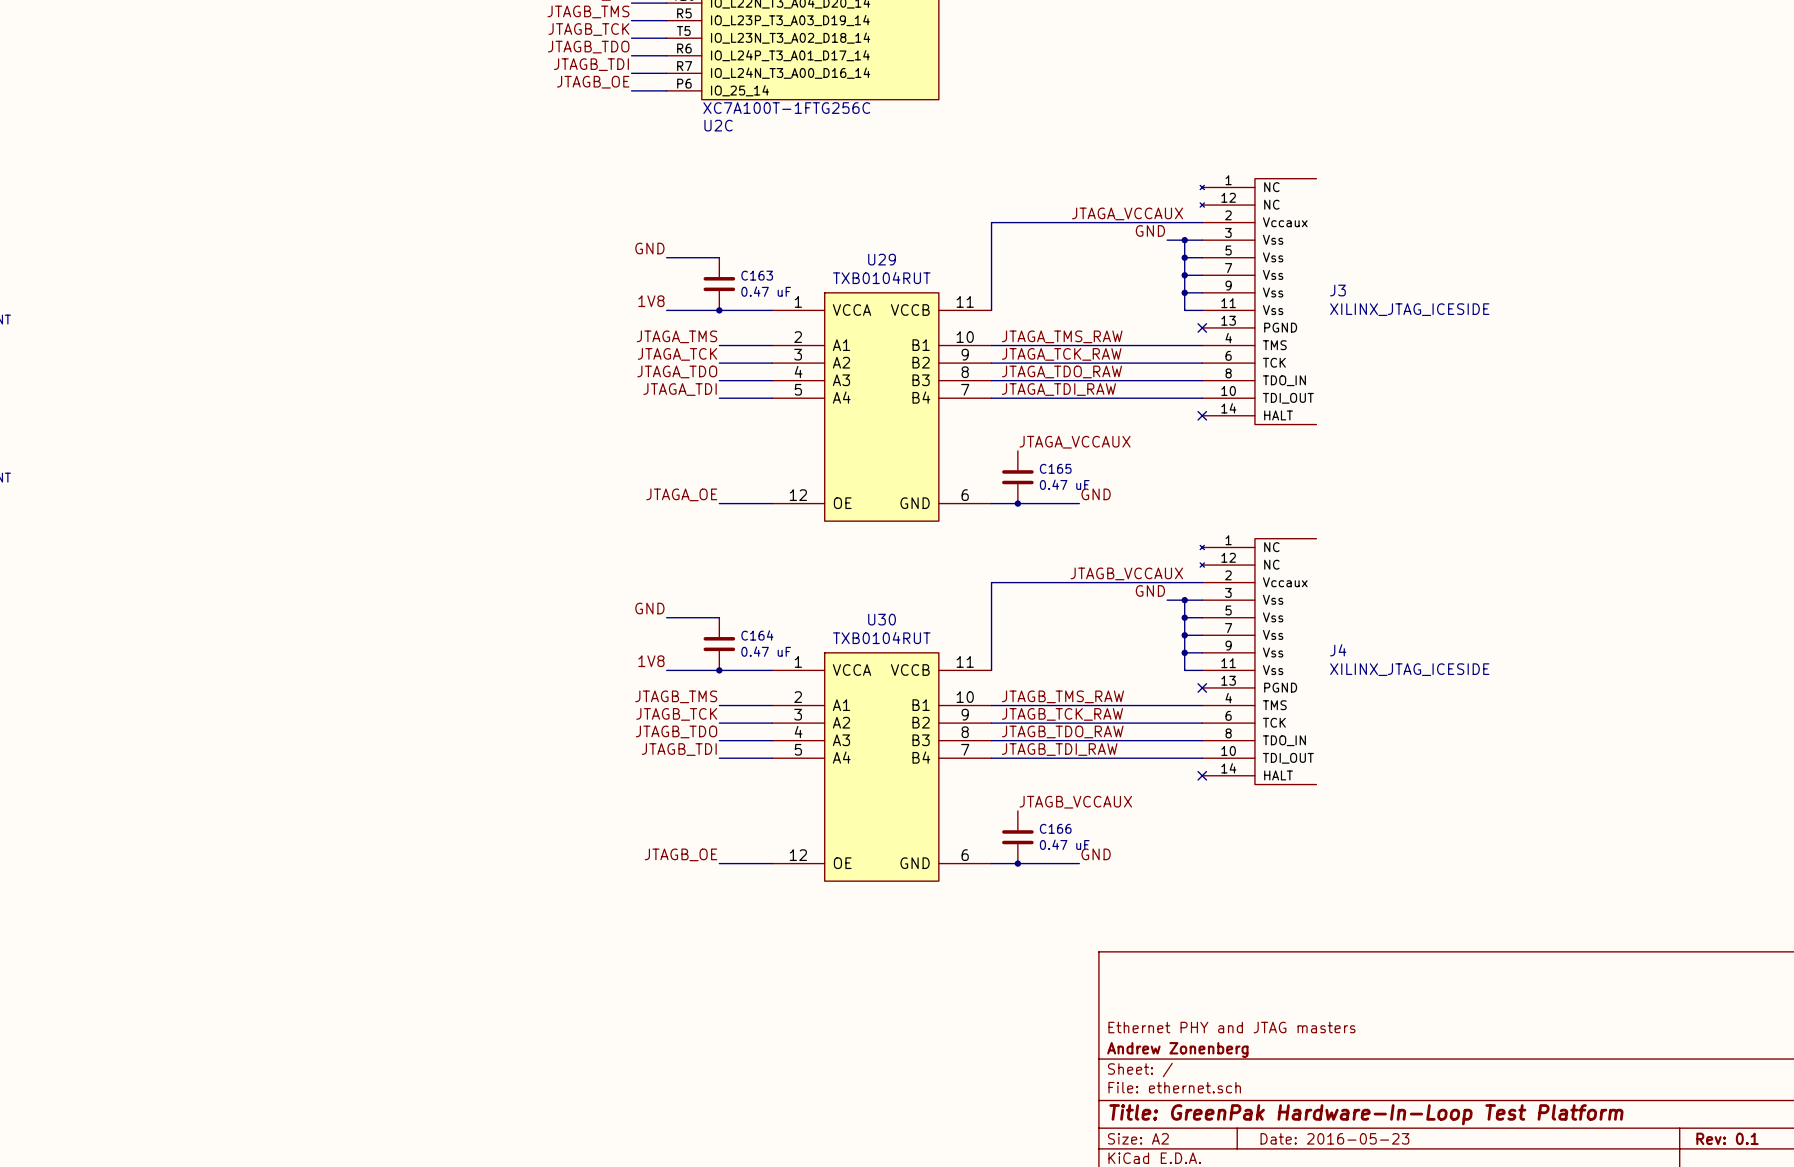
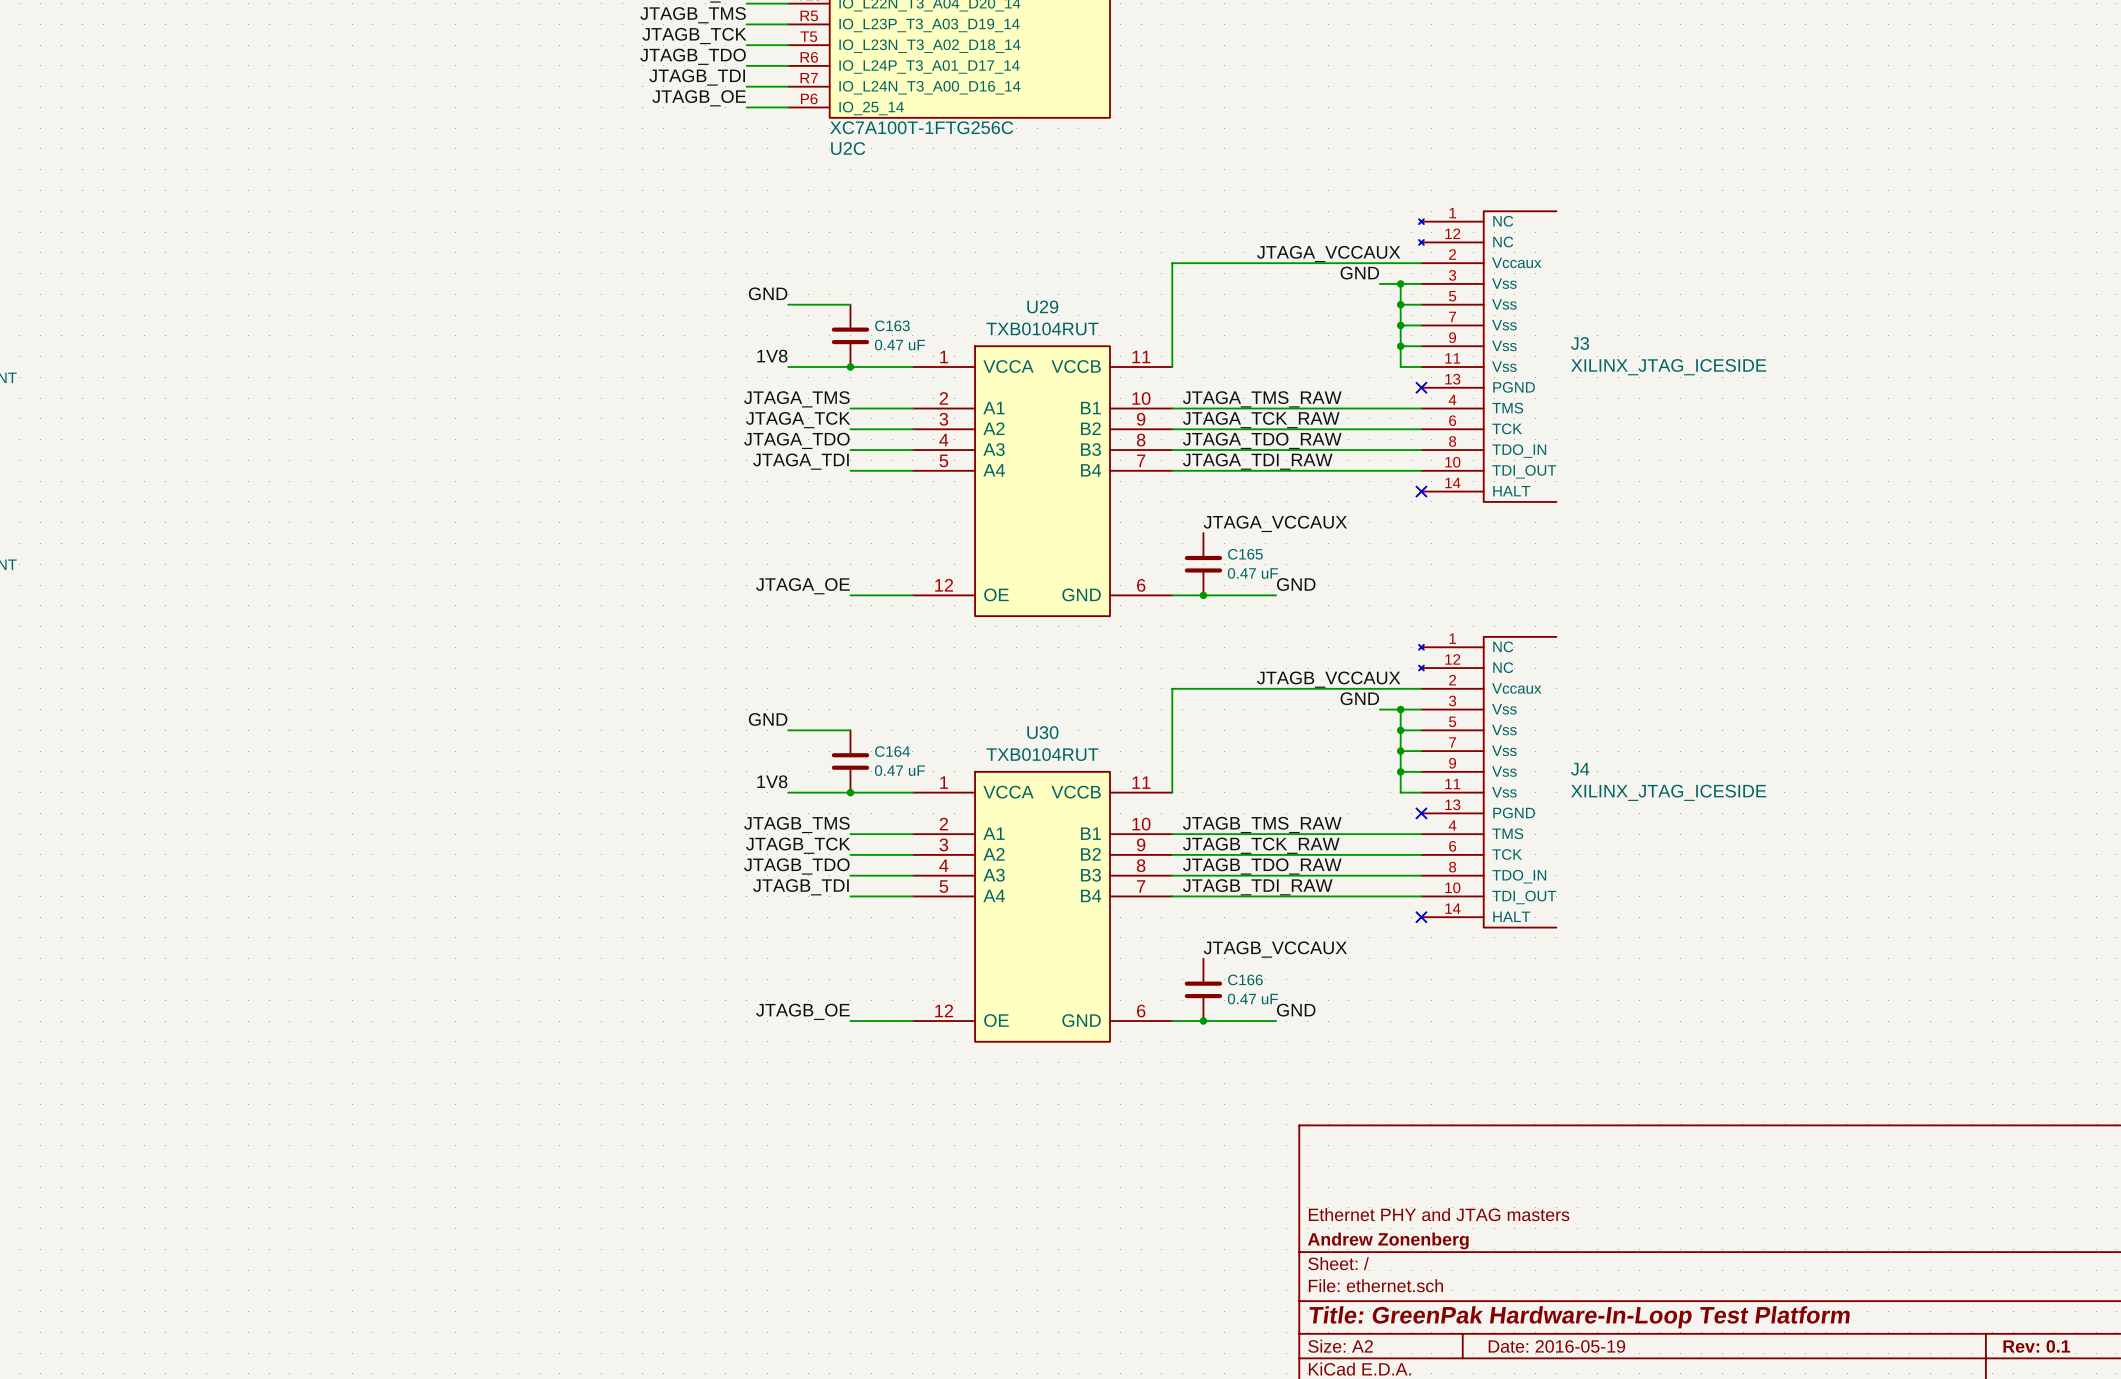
title block: Date: 2016-05-23 (1334, 1138) -> Date: 2016-05-19 (1556, 1346)

